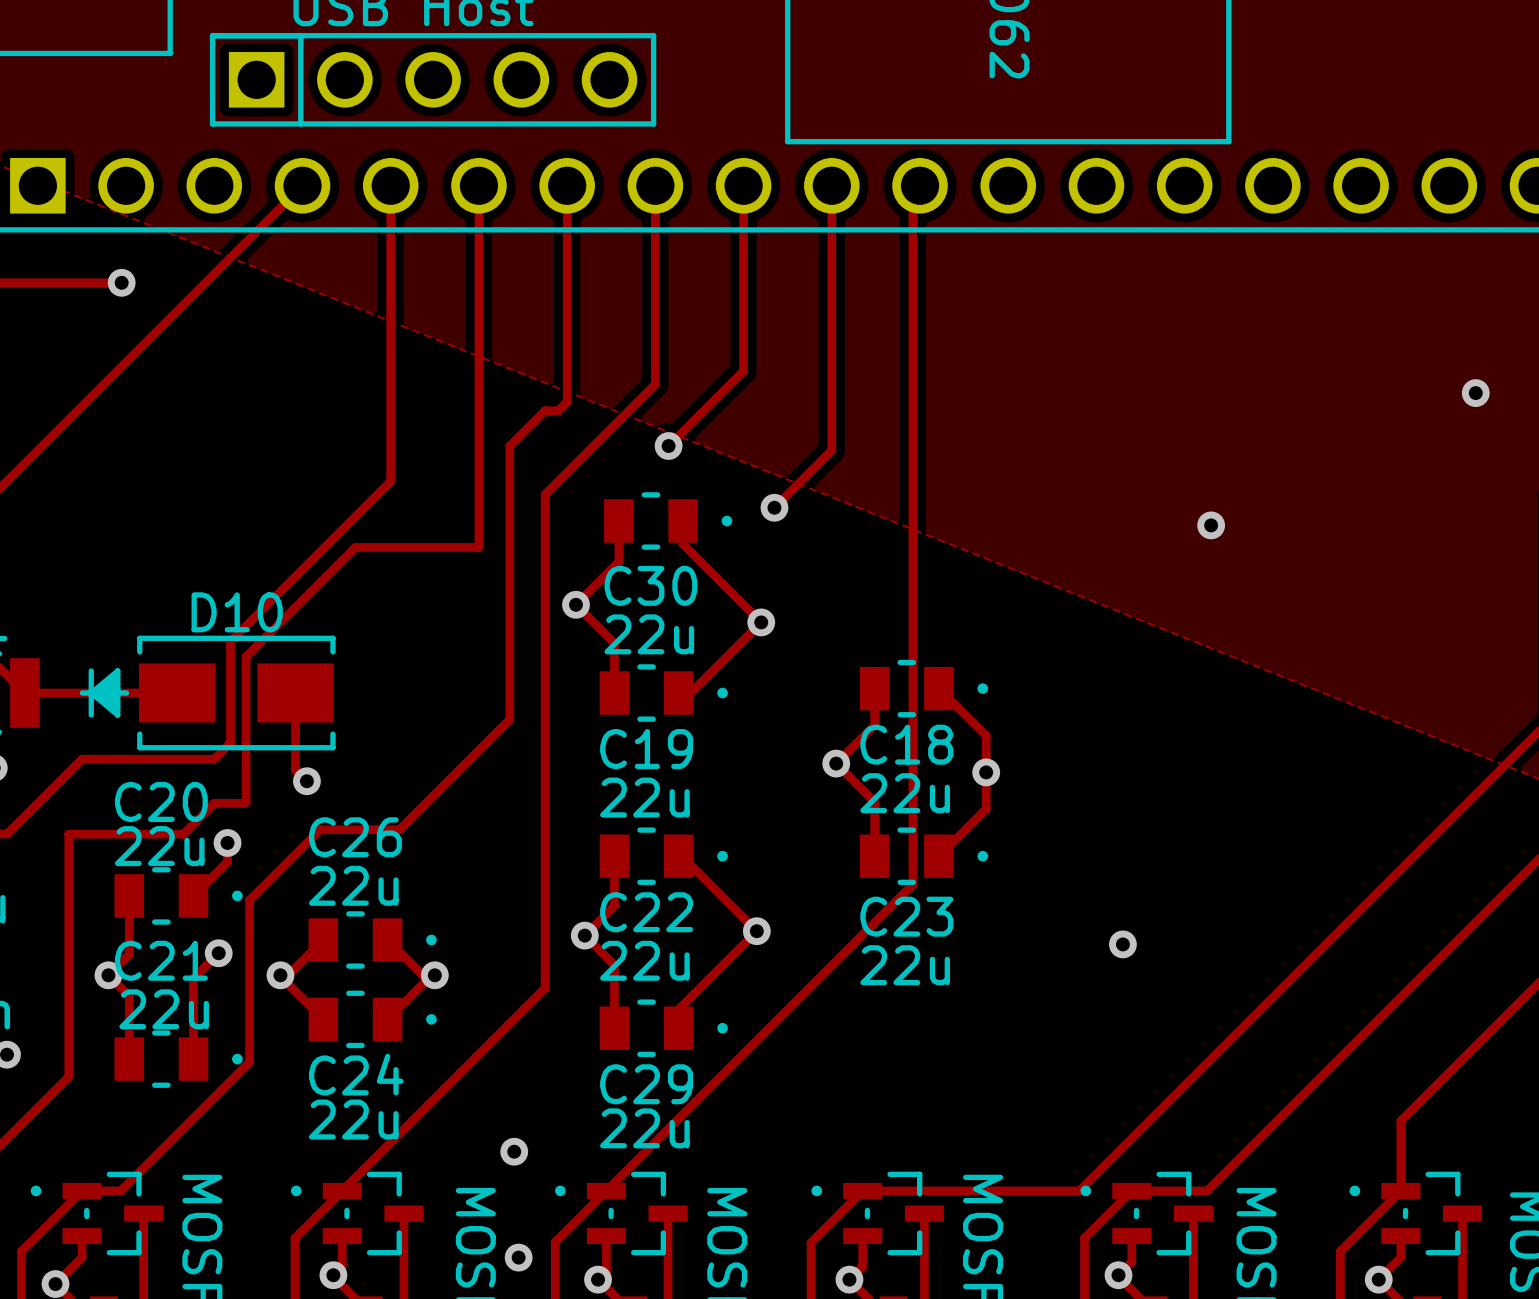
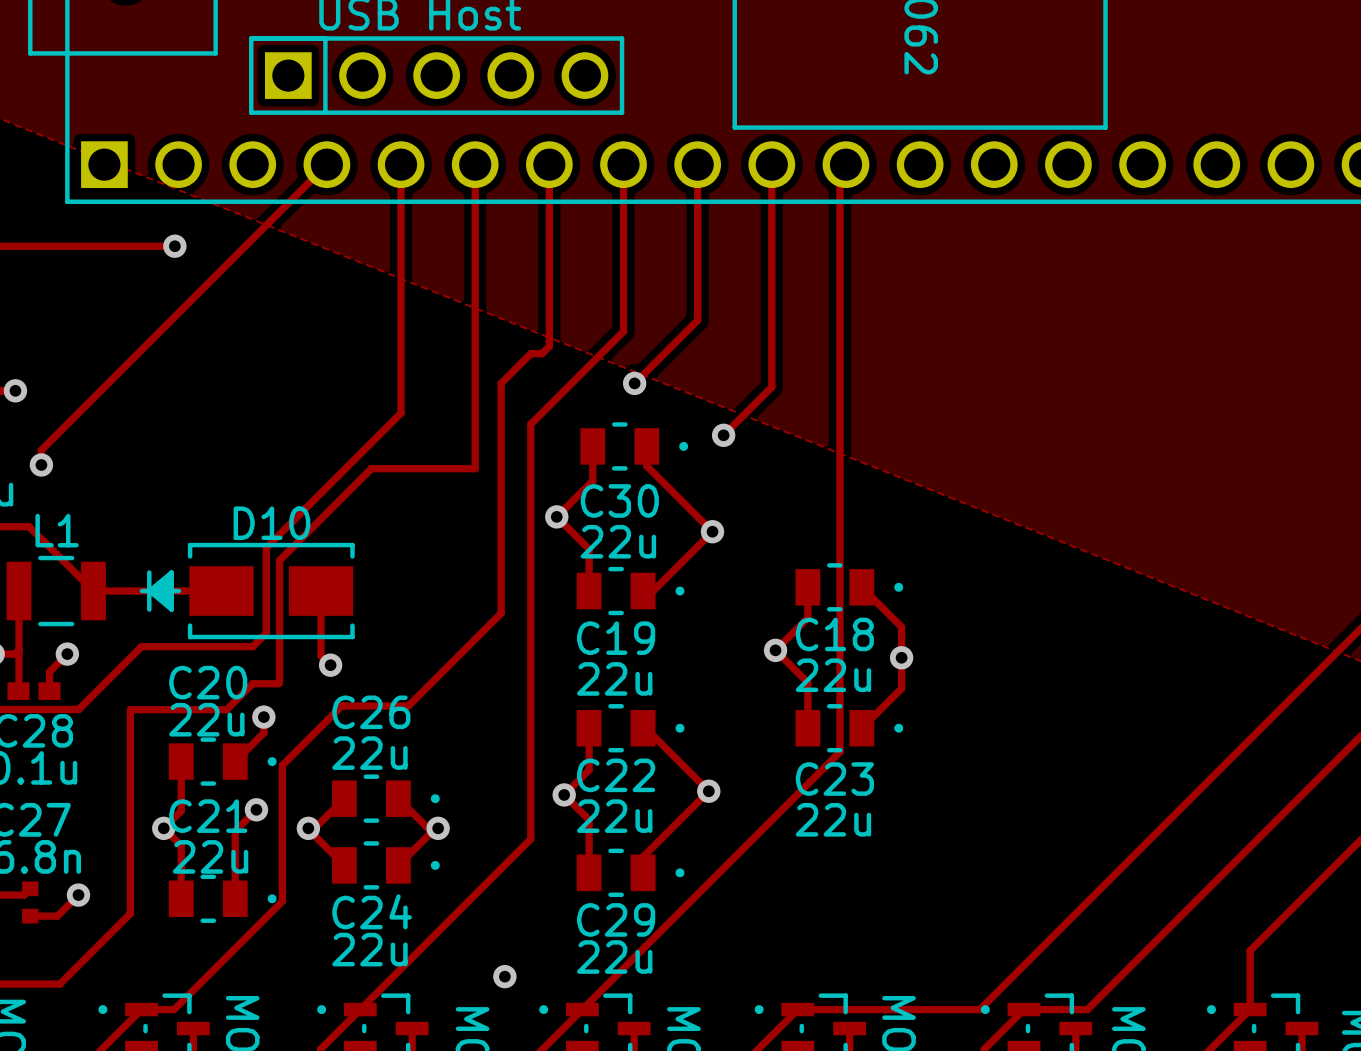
via: (1475, 393) -> none
via: (1211, 525) -> none
via: (1122, 944) -> none

